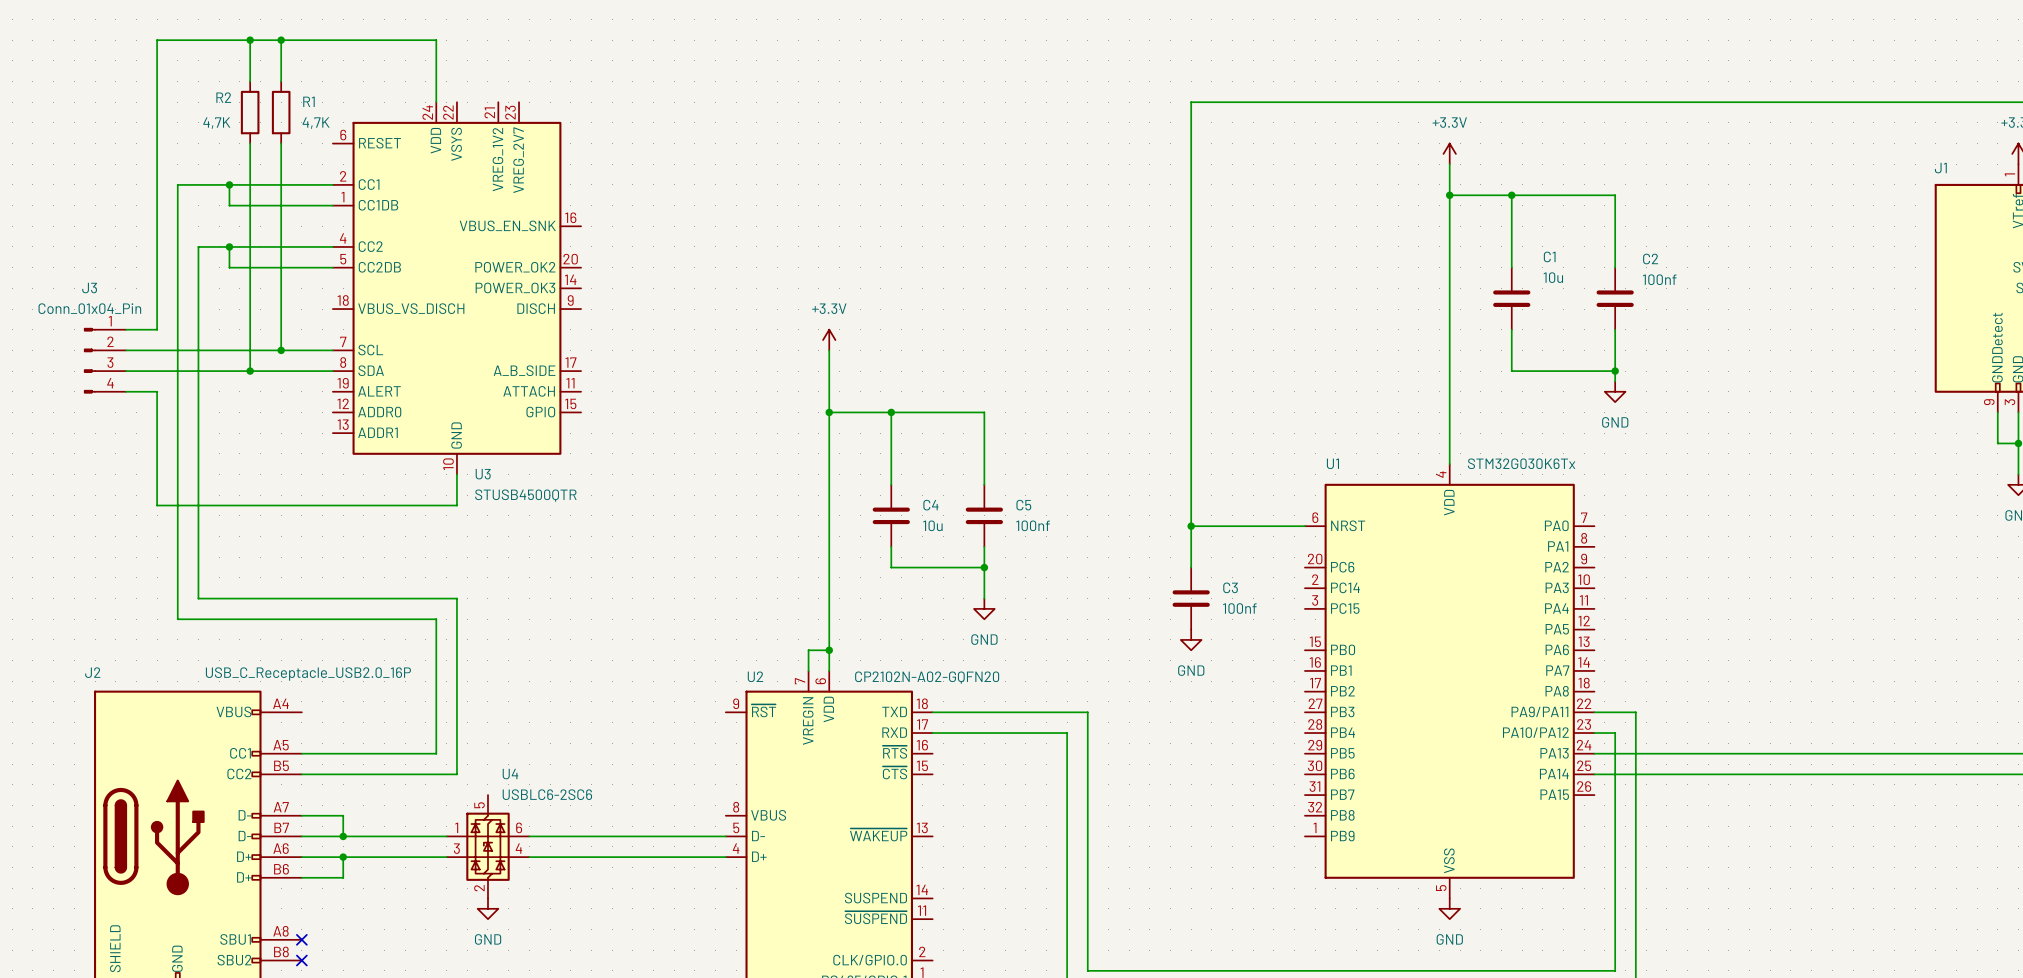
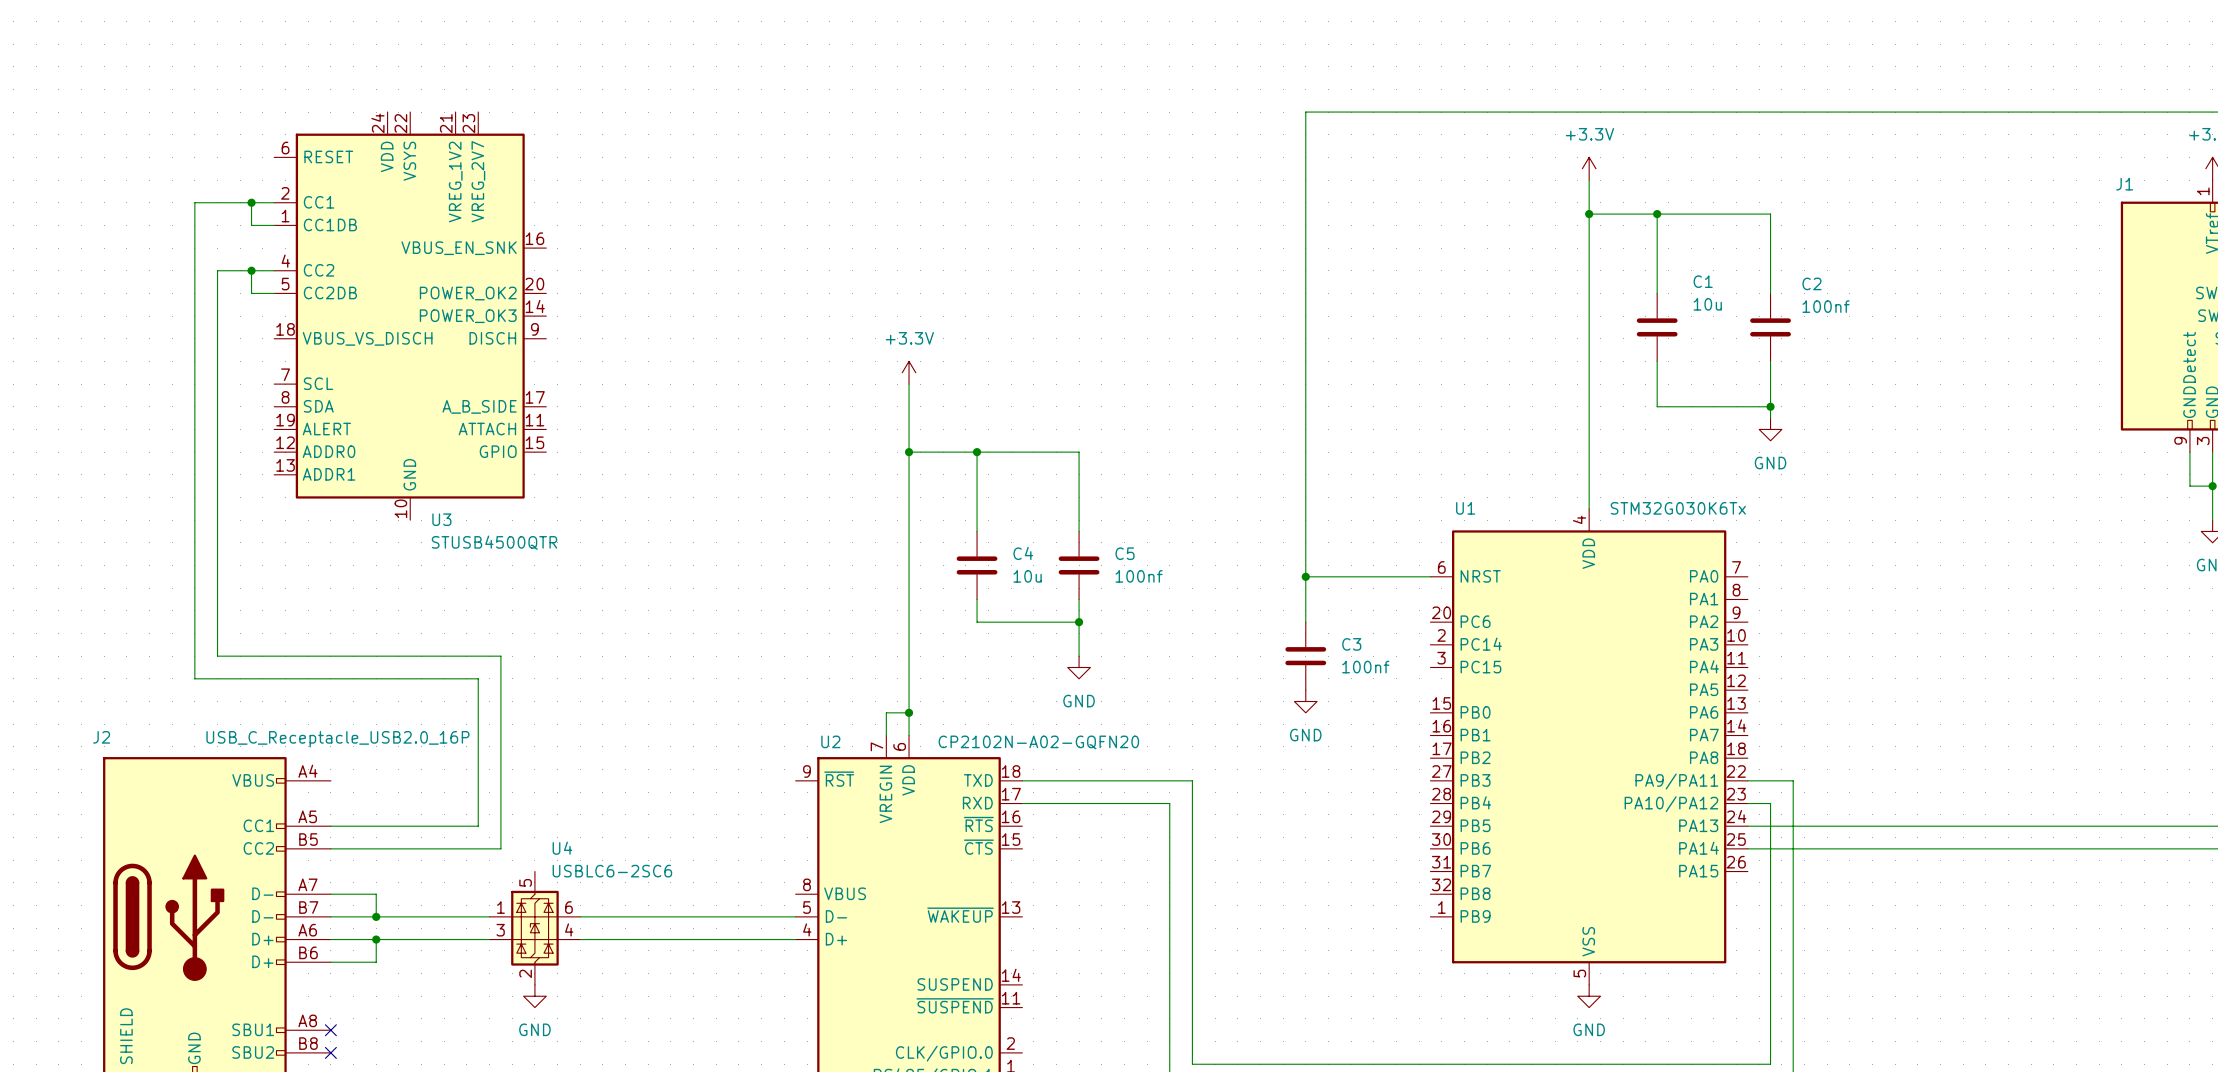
wire: (250, 40) (250, 81) -> none
junction: (250, 40) -> none
wire: (281, 40) (281, 81) -> none
junction: (281, 40) -> none
wire: (436, 102) (436, 40) (157, 40) (157, 329) (126, 329) -> none
R2: 4,7K (250, 112) -> none
R1: 4,7K (281, 112) -> none
wire: (250, 143) (250, 371) -> none
U3 position: (456, 288) -> (410, 316)
wire: (126, 350) (332, 350) -> none
junction: (281, 350) -> none
J3: Conn_01x04_Pin (105, 360) -> none
wire: (126, 371) (332, 371) -> none
junction: (250, 371) -> none
wire: (126, 391) (157, 391) (157, 505) (456, 505) (456, 474) -> none

